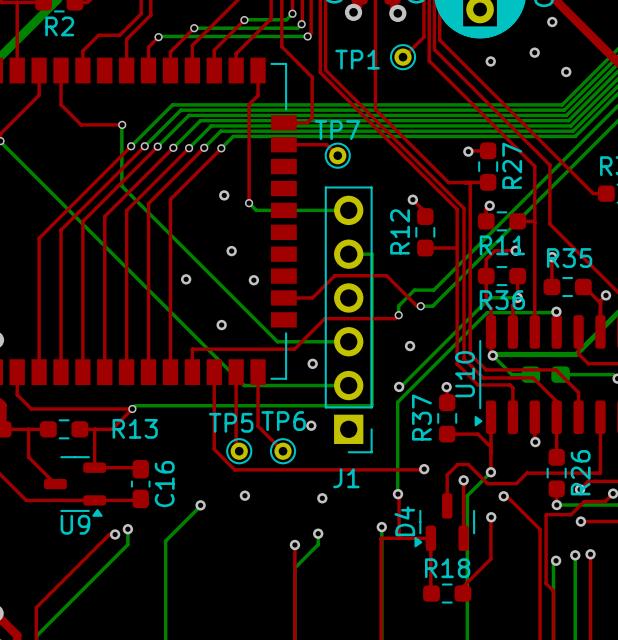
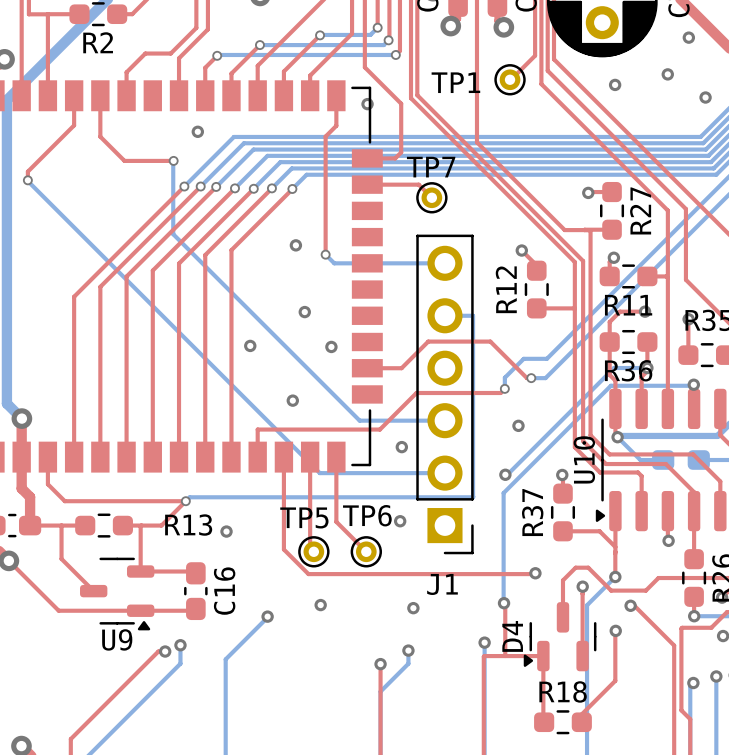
via: none -> (367, 104)
via: none -> (197, 131)
via: none -> (226, 531)

